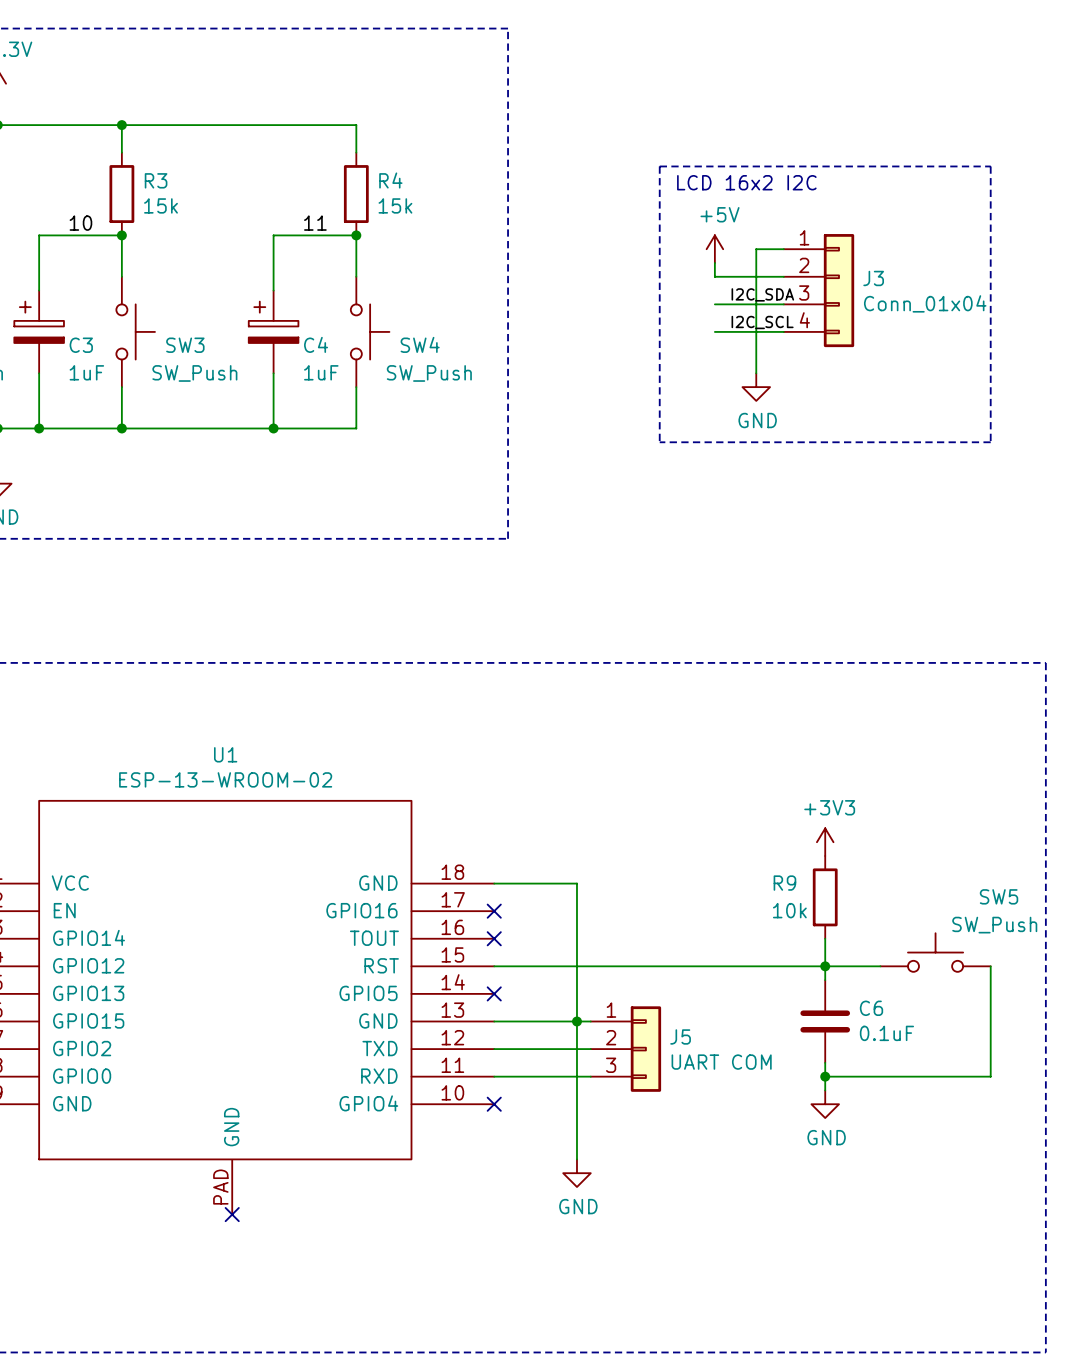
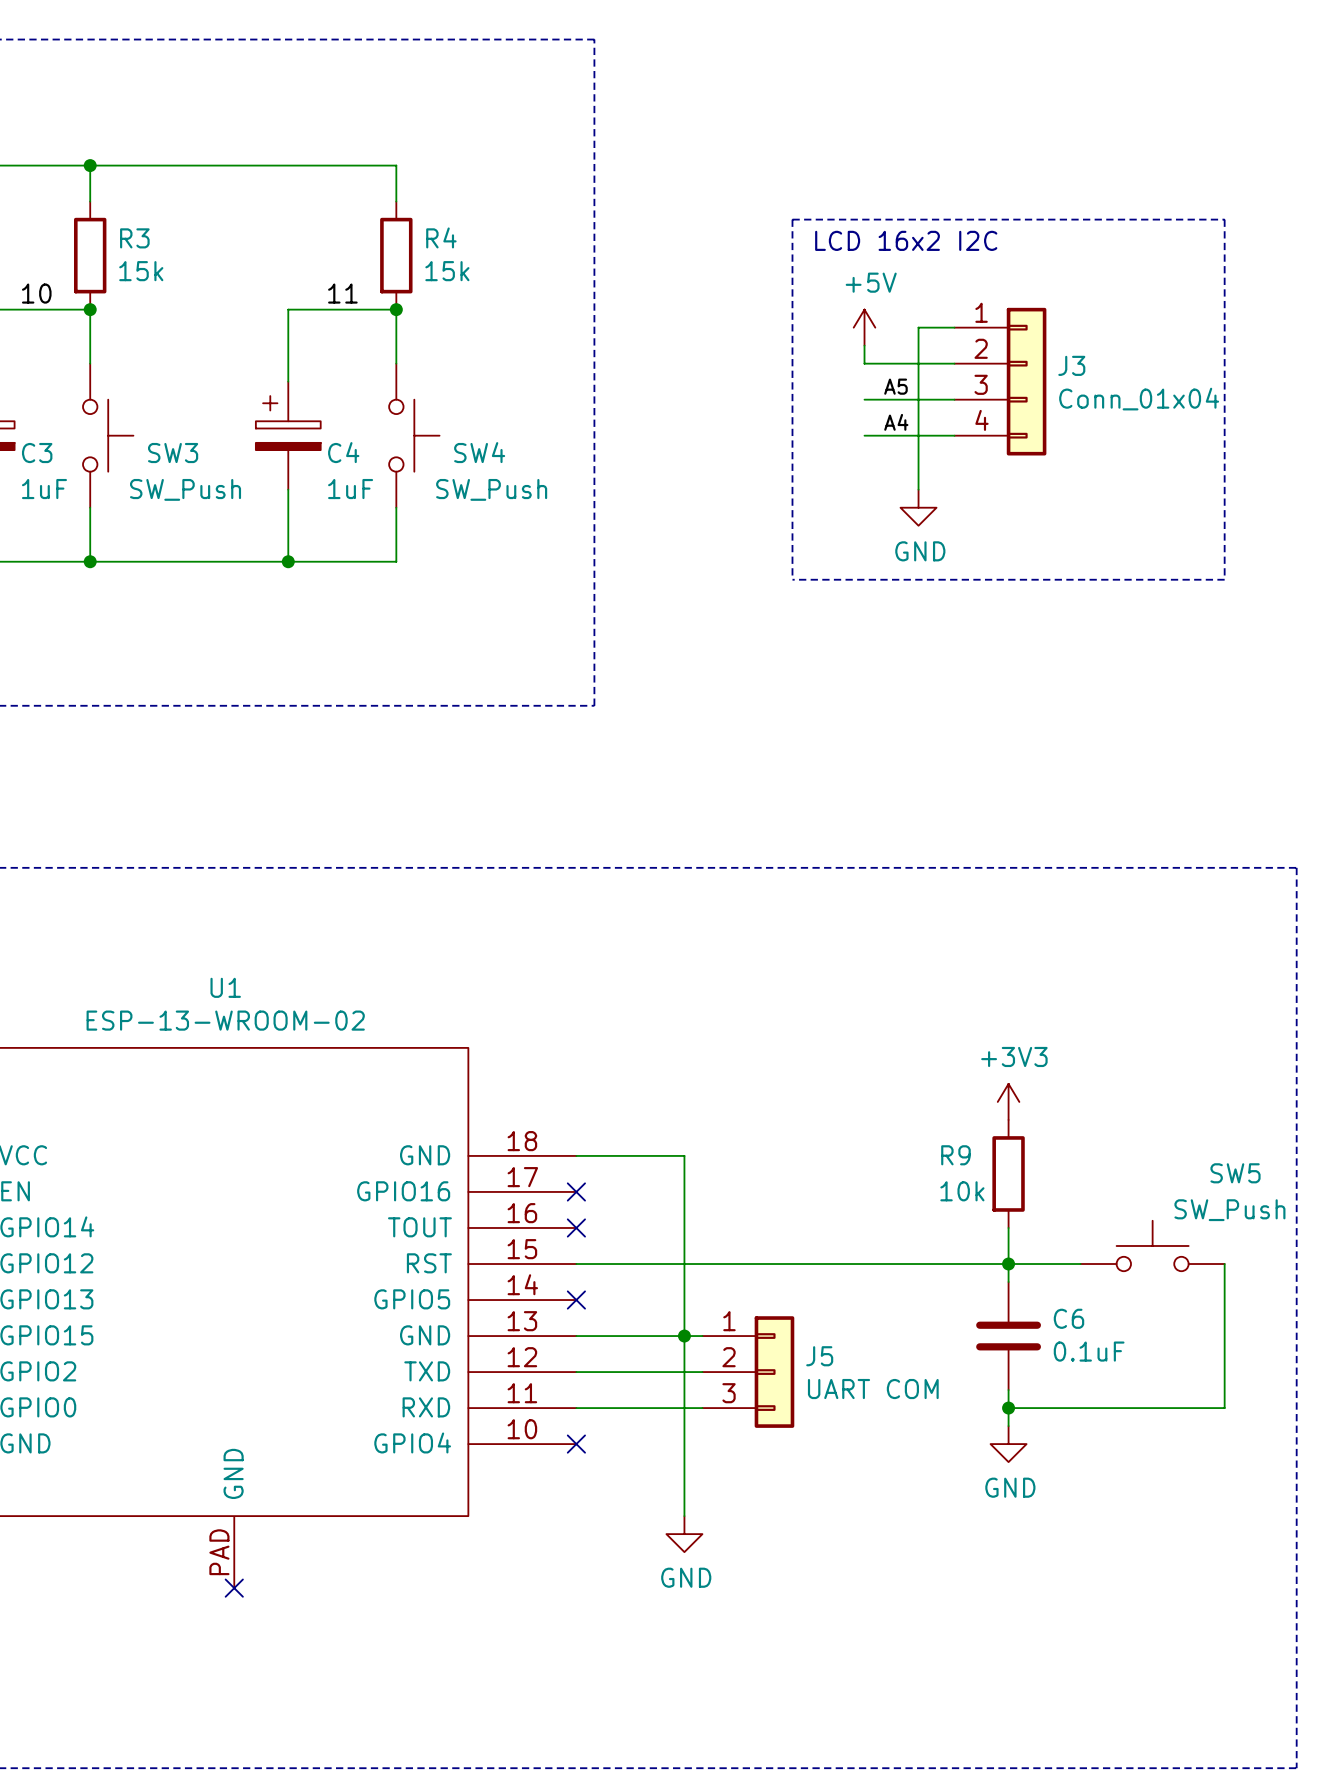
label: I2C_SDA (762, 294) -> A5 (895, 386)
label: I2C_SCL (762, 322) -> A4 (896, 422)

